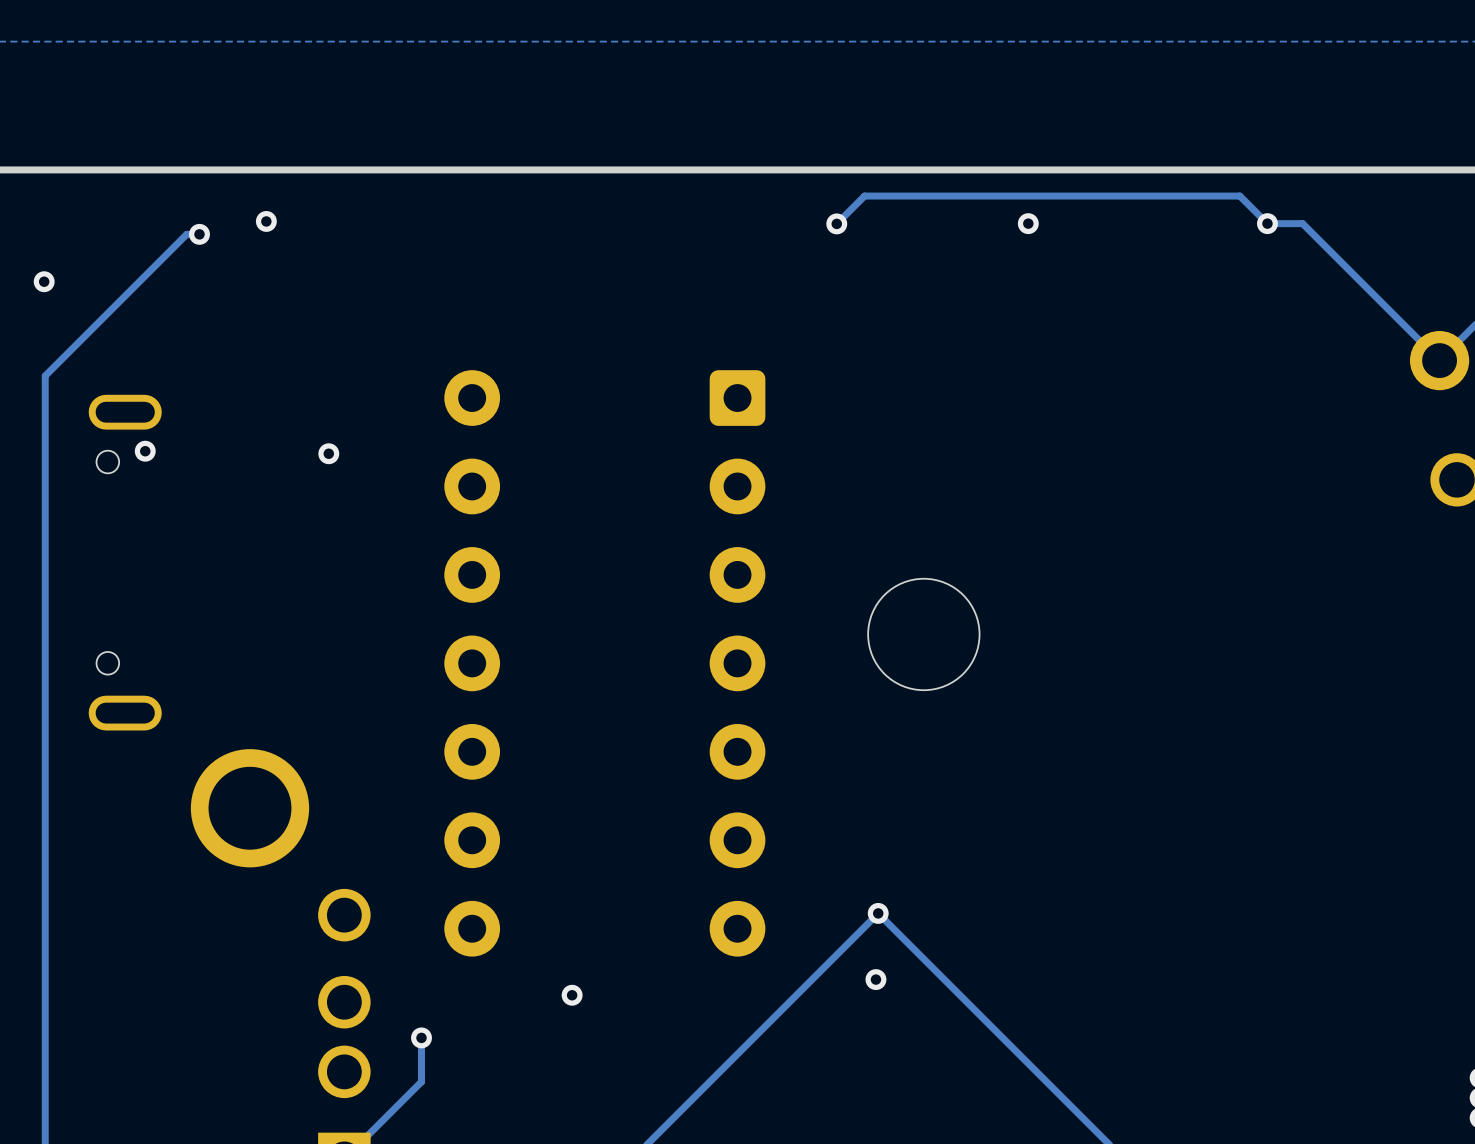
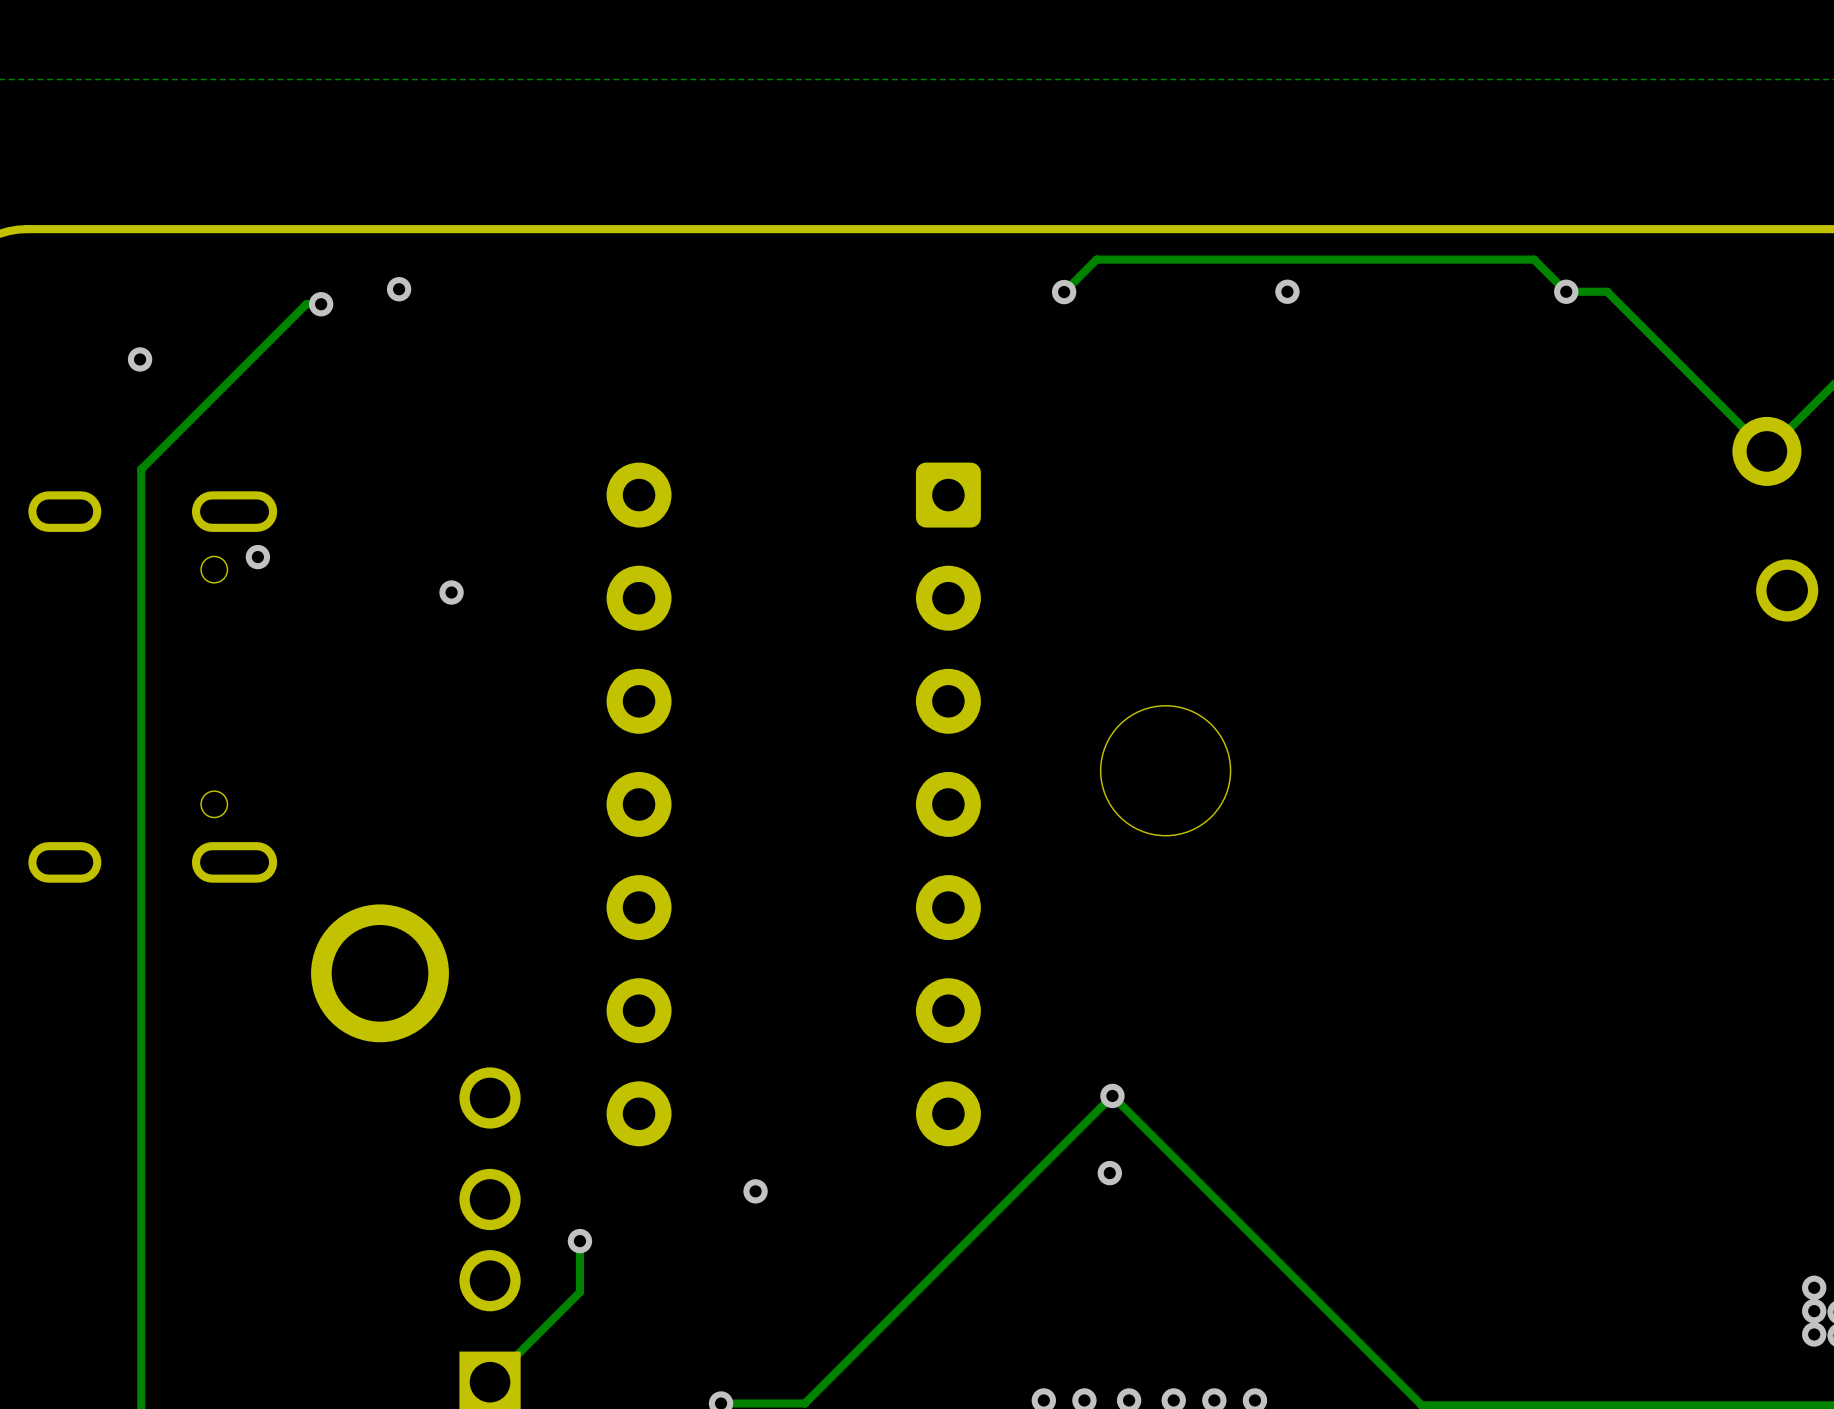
via position: (328, 453) -> (451, 592)

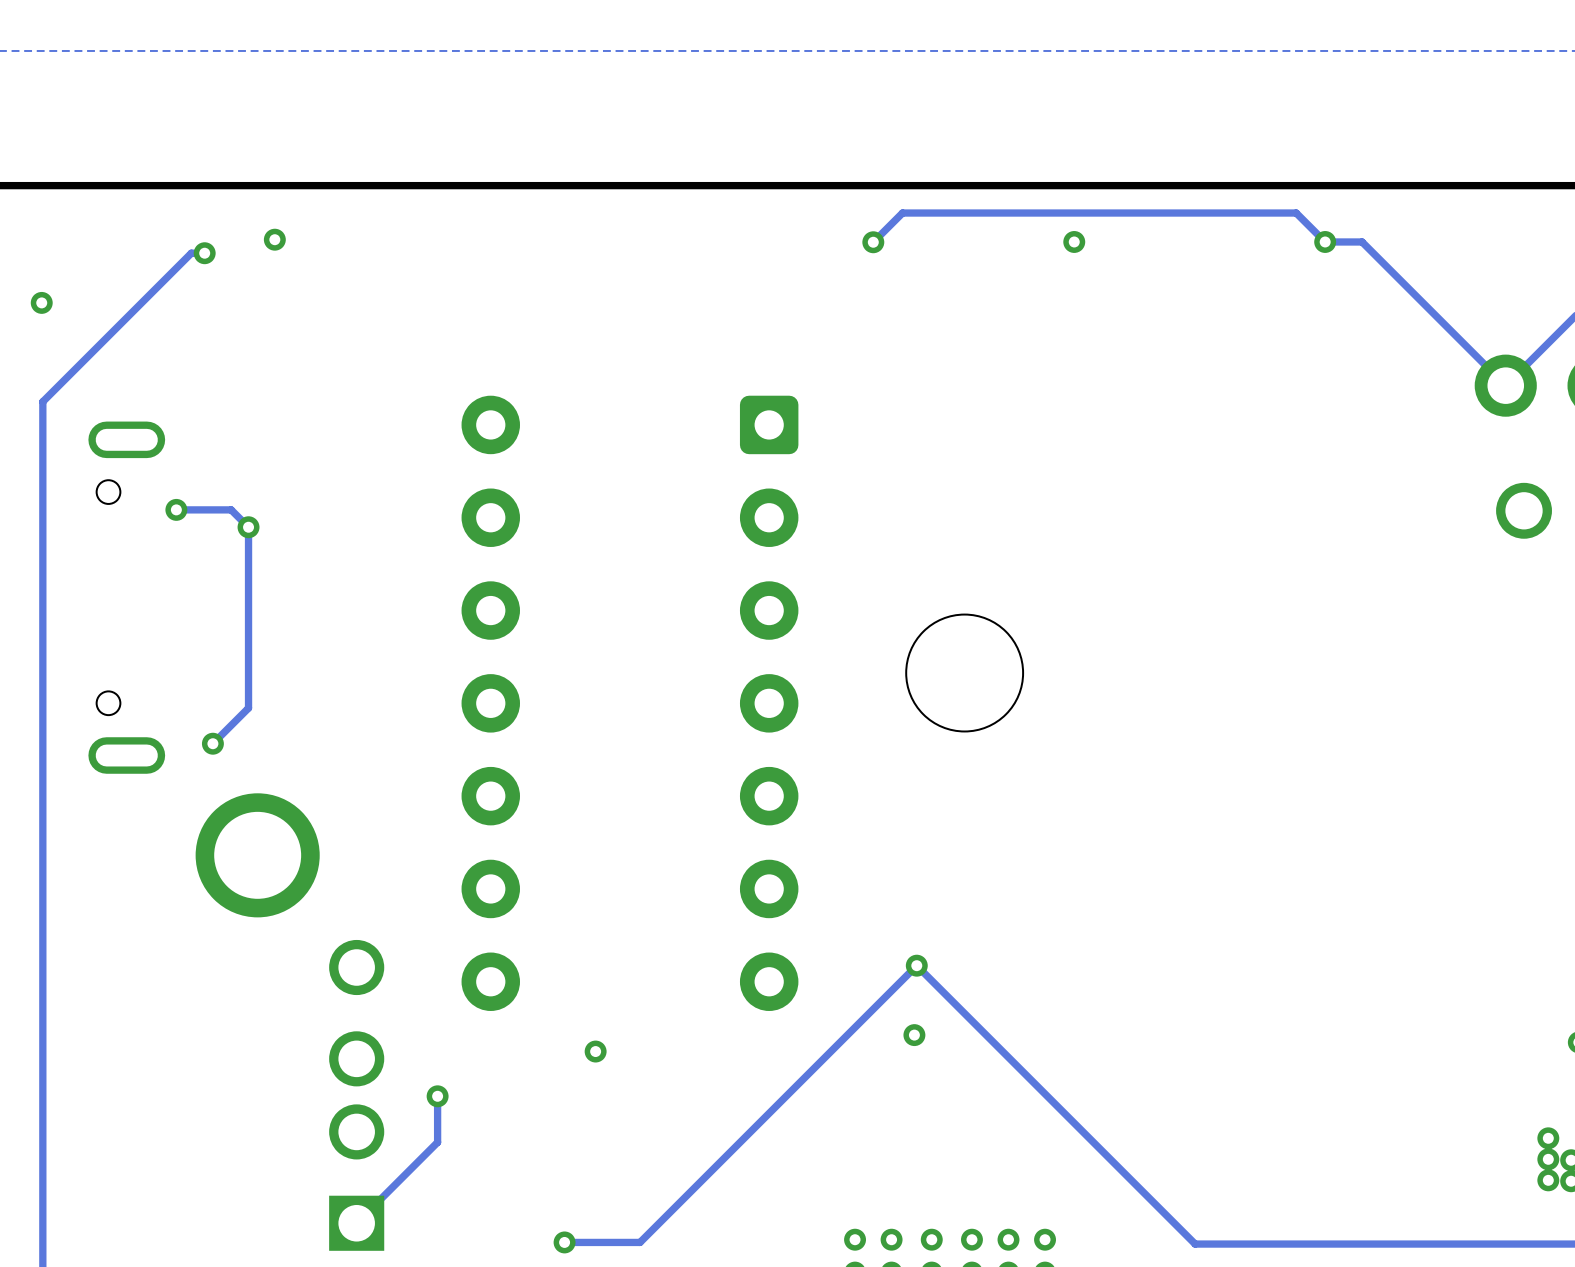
via position: (257, 557) -> (176, 509)
track: none -> (176, 509) (231, 509) (248, 527) (248, 708) (212, 743)
via: (451, 592) -> none
via: none -> (248, 527)
via: none -> (212, 743)

